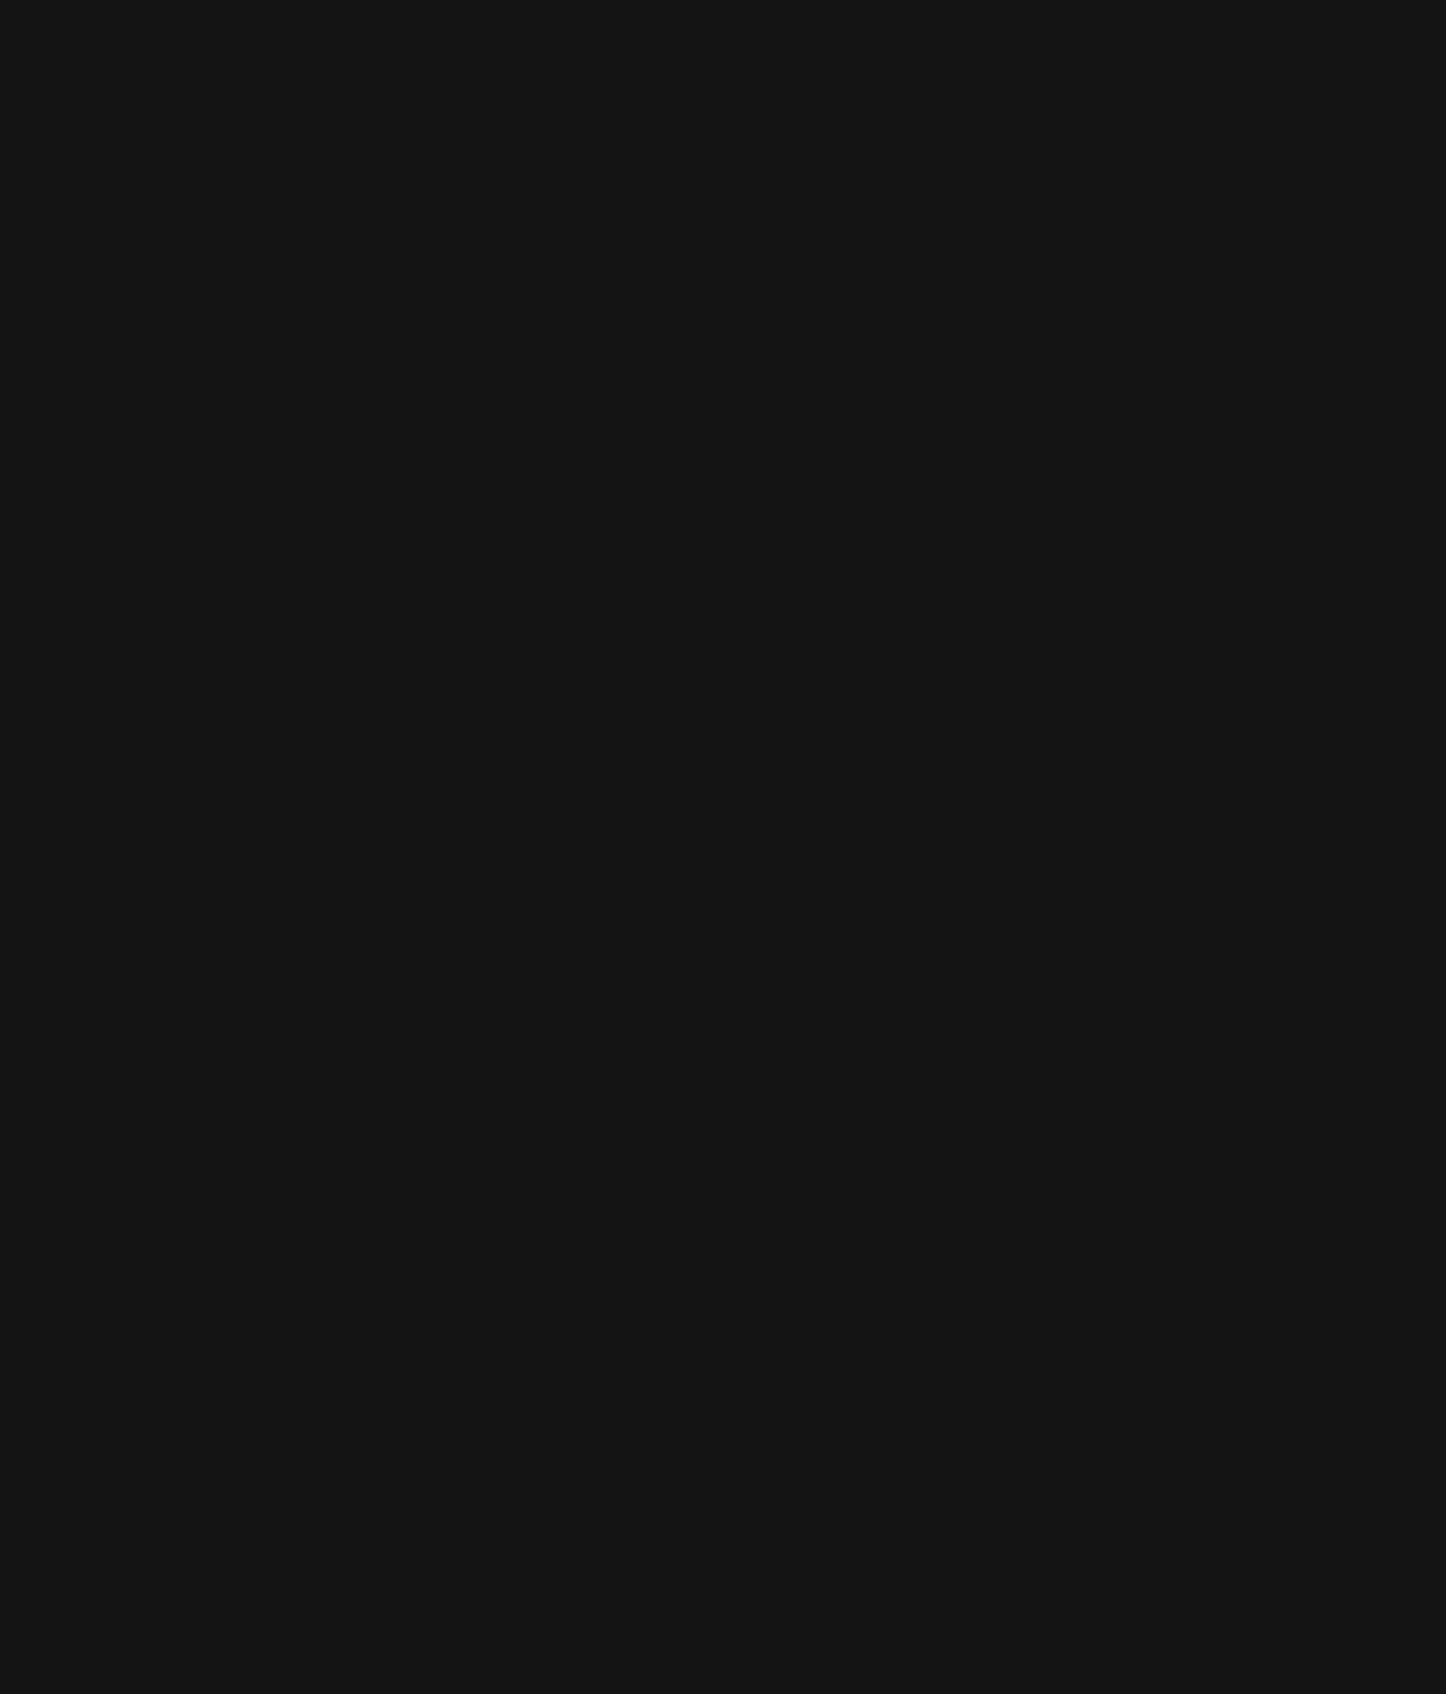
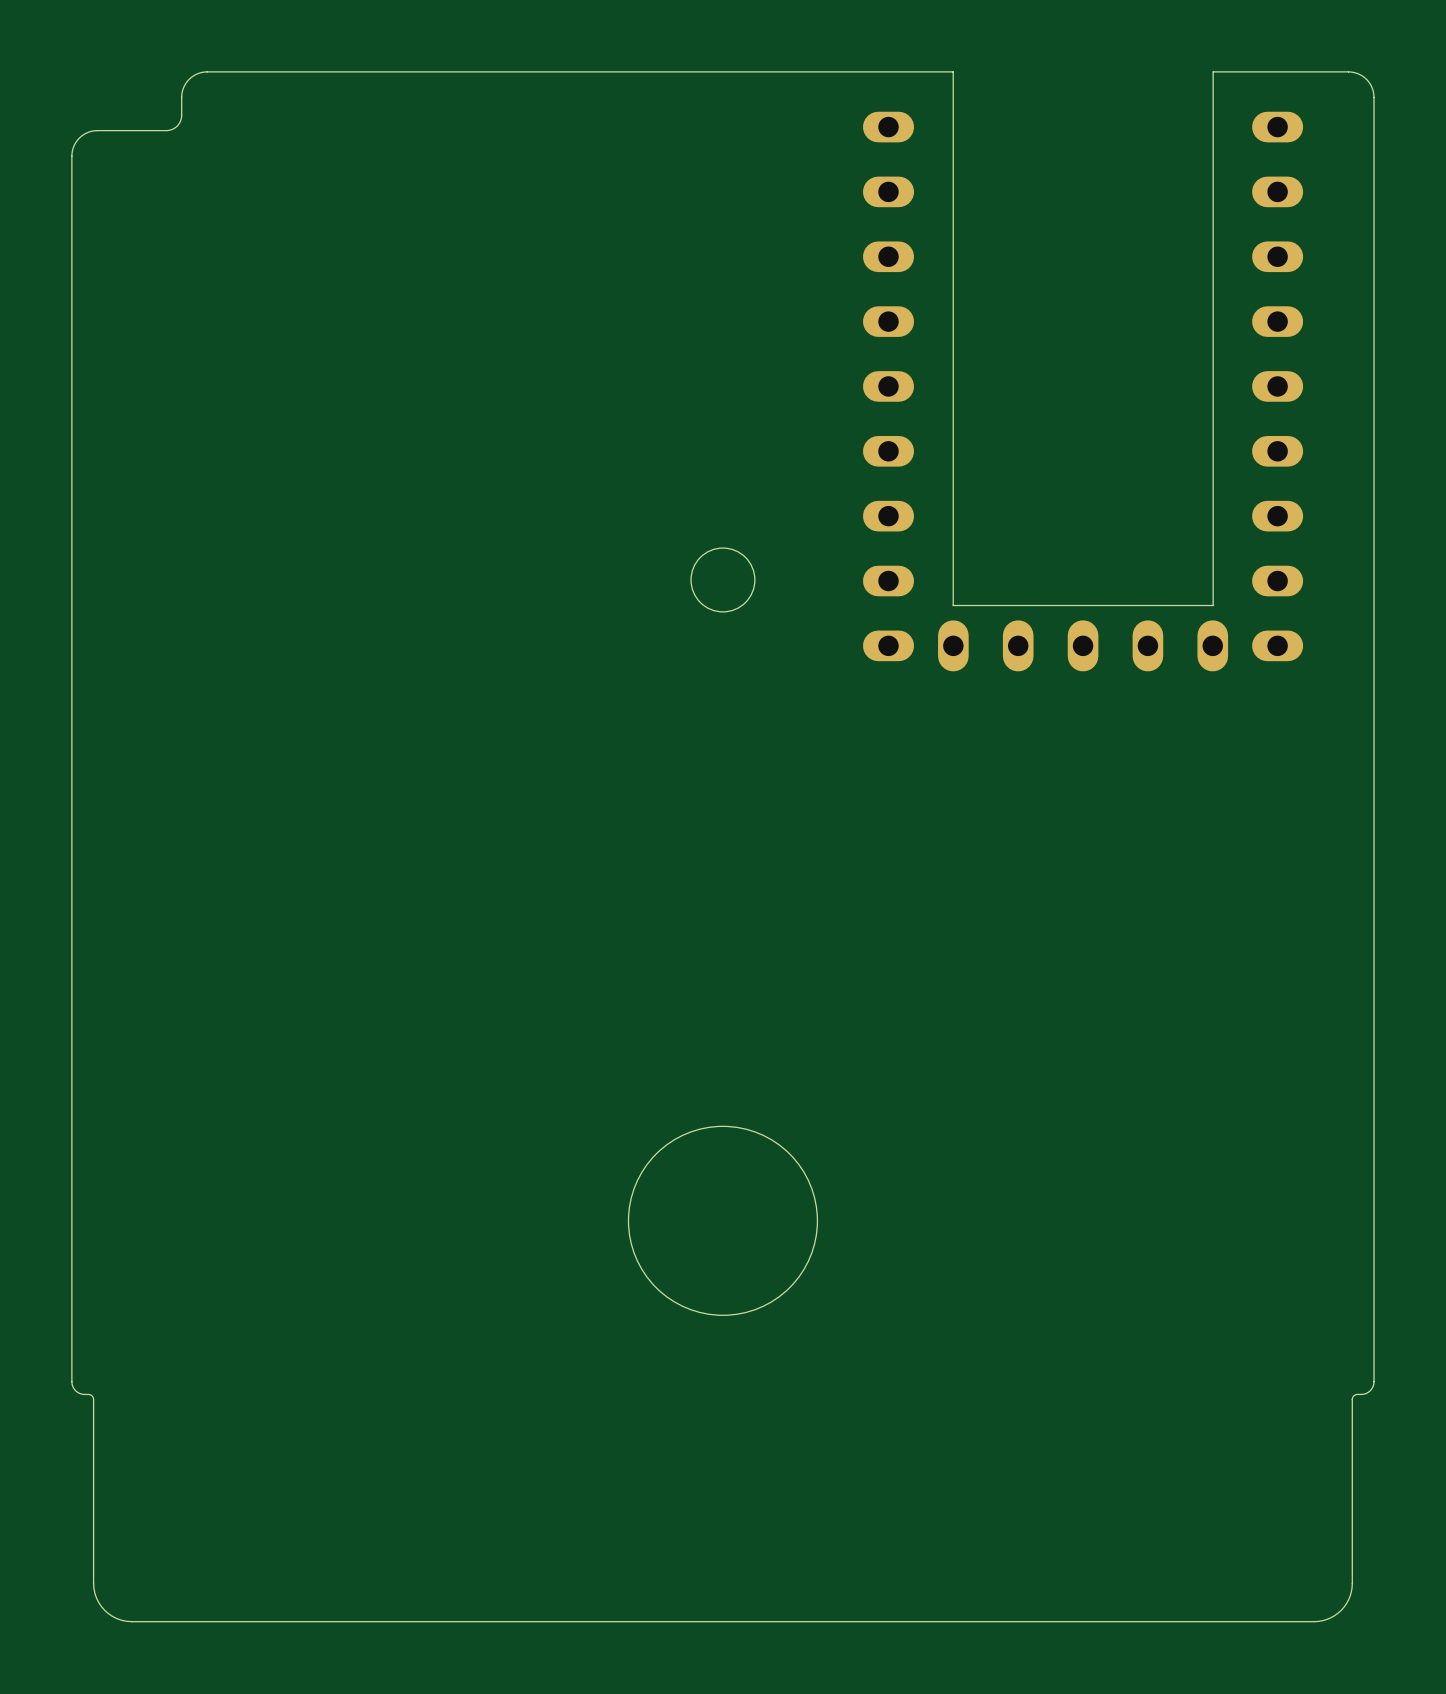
board edge: none -> (1348, 71) (1213, 71) (1213, 605) (953, 605) (953, 71) (204, 72) (193, 75) (184, 86) (181, 94) (181, 119) (174, 128) (166, 130) (94, 130) (83, 134) (77, 140) (71, 156) (71, 1381) (76, 1391) (90, 1394) (93, 1398) (93, 1588) (98, 1602) (108, 1613) (121, 1620) (131, 1621) (1314, 1621) (1330, 1617) (1343, 1607) (1350, 1596) (1352, 1583) (1352, 1398) (1355, 1394) (1369, 1391) (1374, 1381) (1374, 97) (1372, 88) (1366, 79) (1359, 74) (1348, 71)
part: none -> (1083, 391)
round board edge: none -> [690, 547, 756, 613]
round board edge: none -> [627, 1125, 819, 1316]

